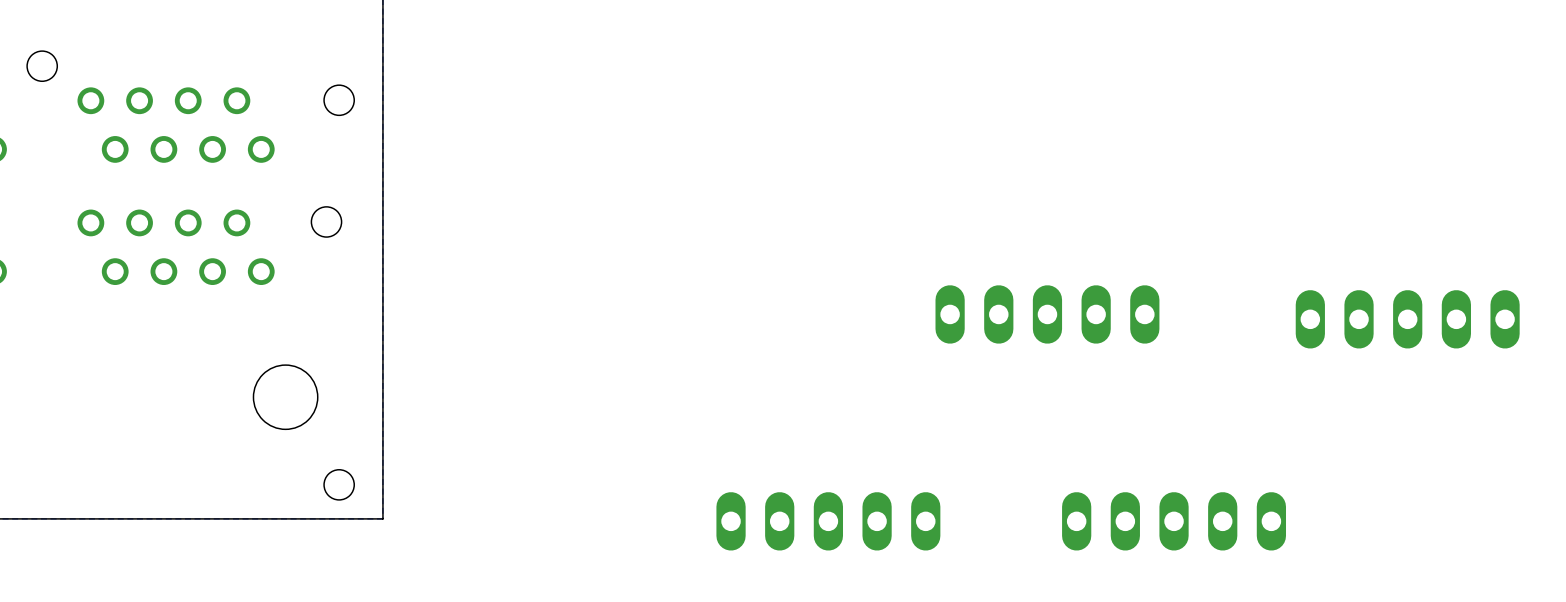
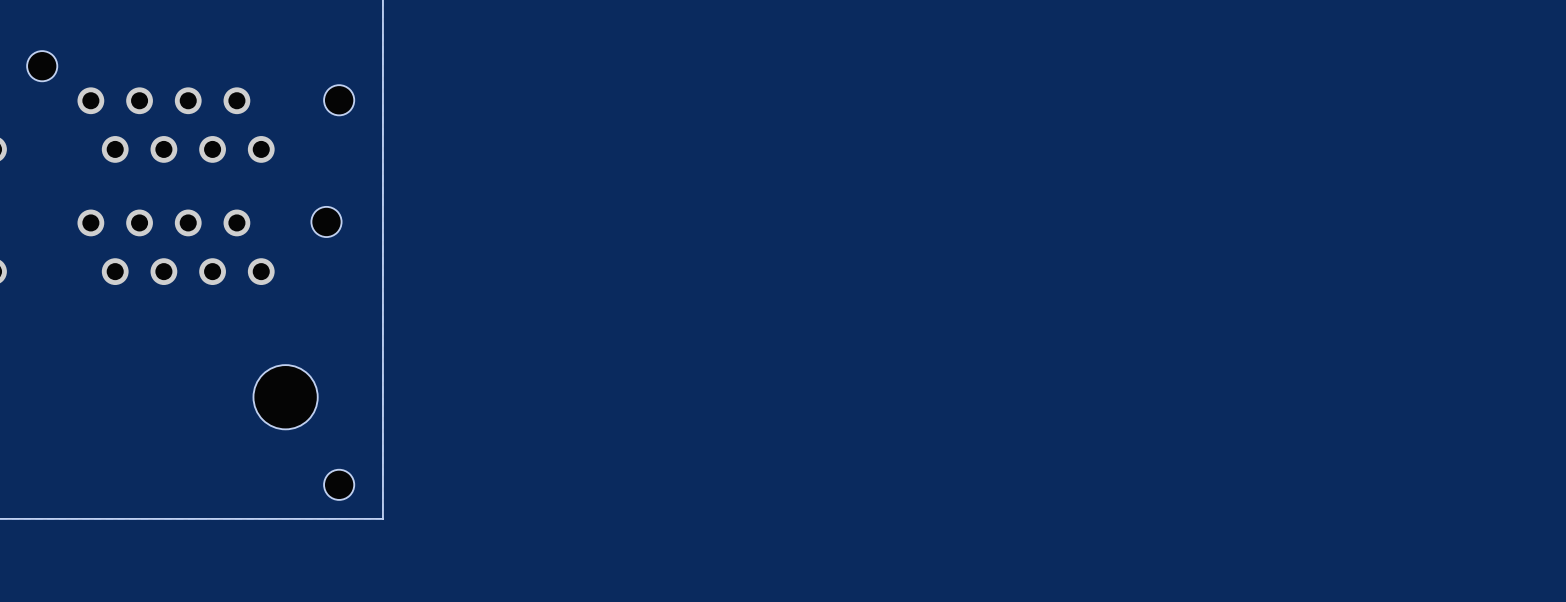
part: (1047, 314) -> none
part: (1407, 319) -> none
part: (828, 521) -> none
part: (1174, 521) -> none

